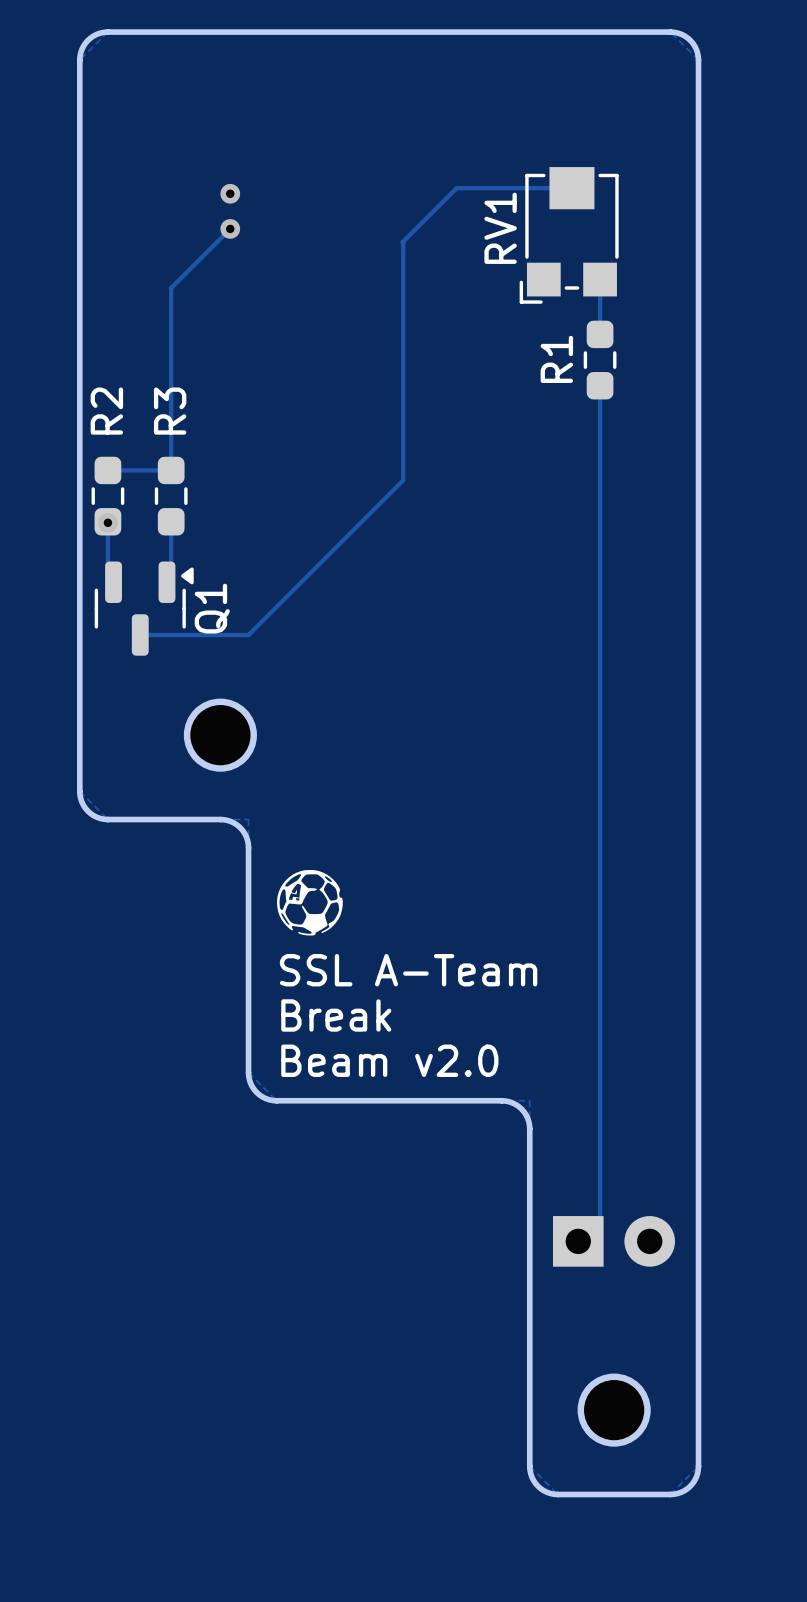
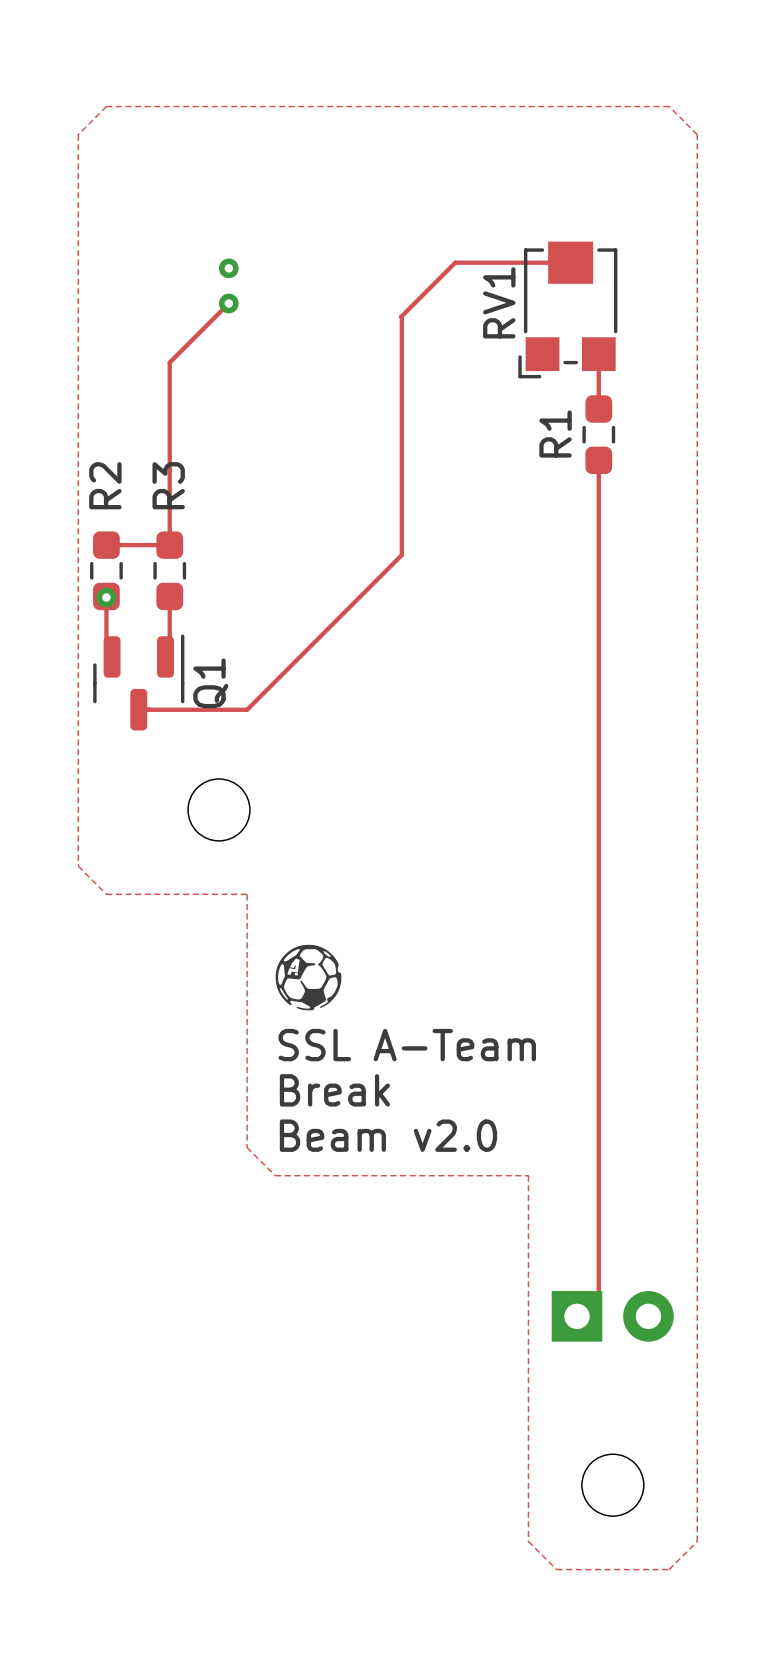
board edge: (107, 32) (670, 32) (684, 35) (696, 49) (698, 60) (698, 1466) (692, 1483) (681, 1492) (670, 1494) (554, 1494) (540, 1488) (531, 1477) (529, 1466) (529, 1128) (523, 1111) (512, 1102) (501, 1100) (276, 1100) (259, 1094) (252, 1086) (248, 1072) (248, 847) (244, 833) (234, 823) (224, 819) (104, 819) (90, 813) (81, 802) (79, 791) (79, 60) (82, 47) (88, 40) (95, 34) (107, 32) -> none
Q1 footprint: [94, 561, 194, 656] -> [93, 634, 185, 731]
round board edge: [183, 698, 257, 772] -> none
round board edge: [577, 1373, 651, 1447] -> none

